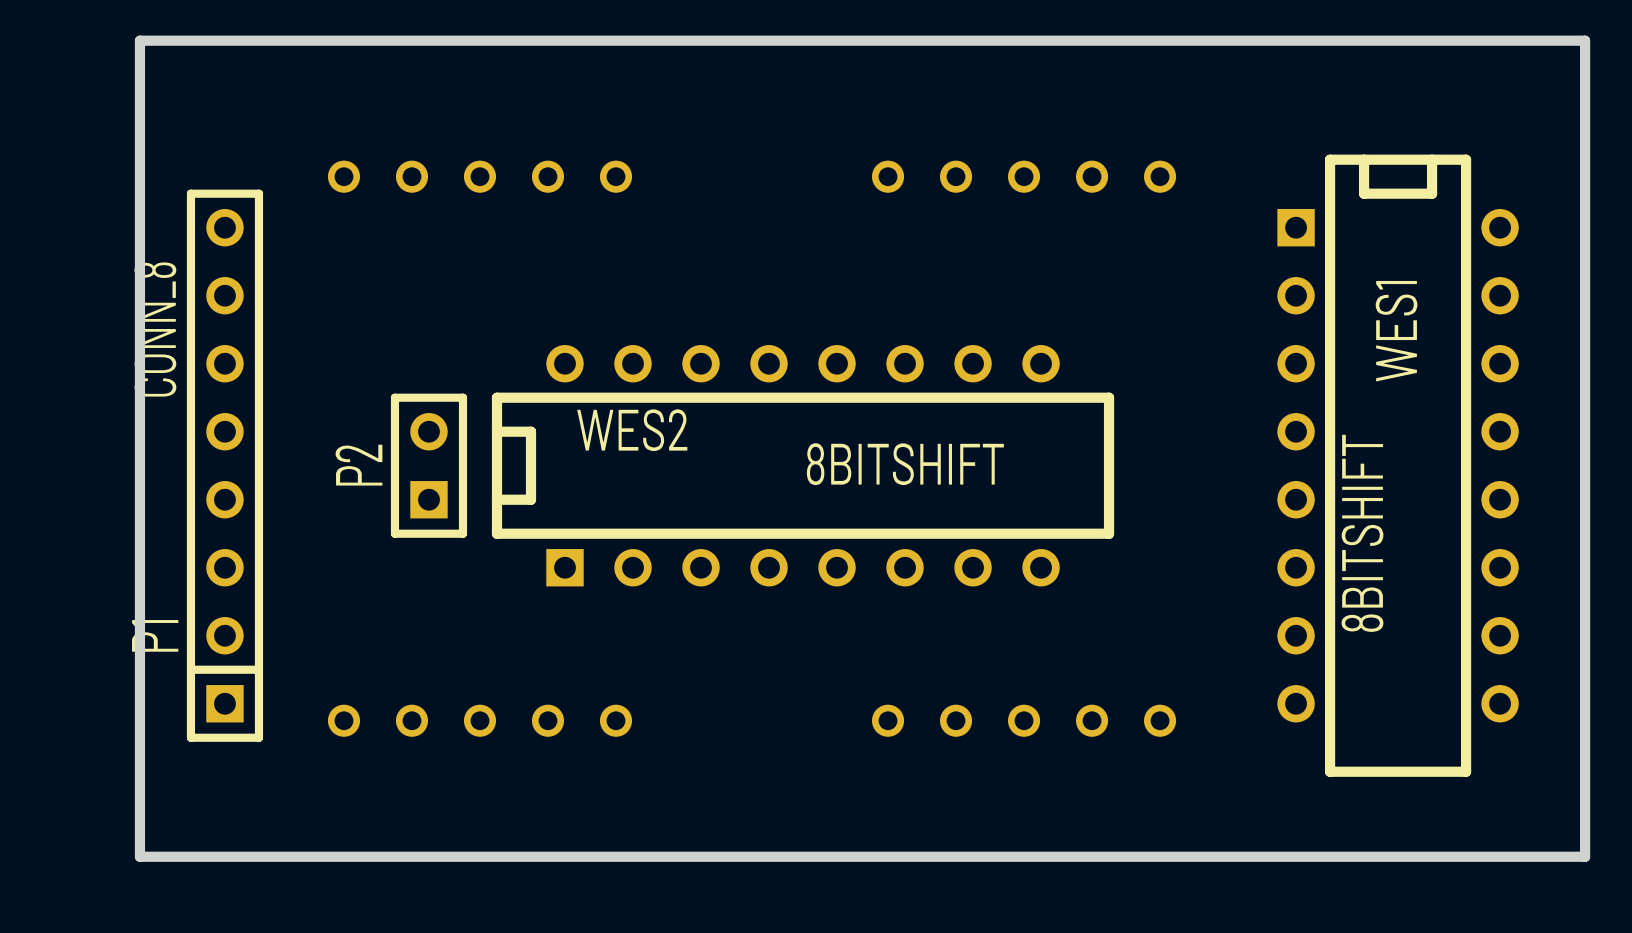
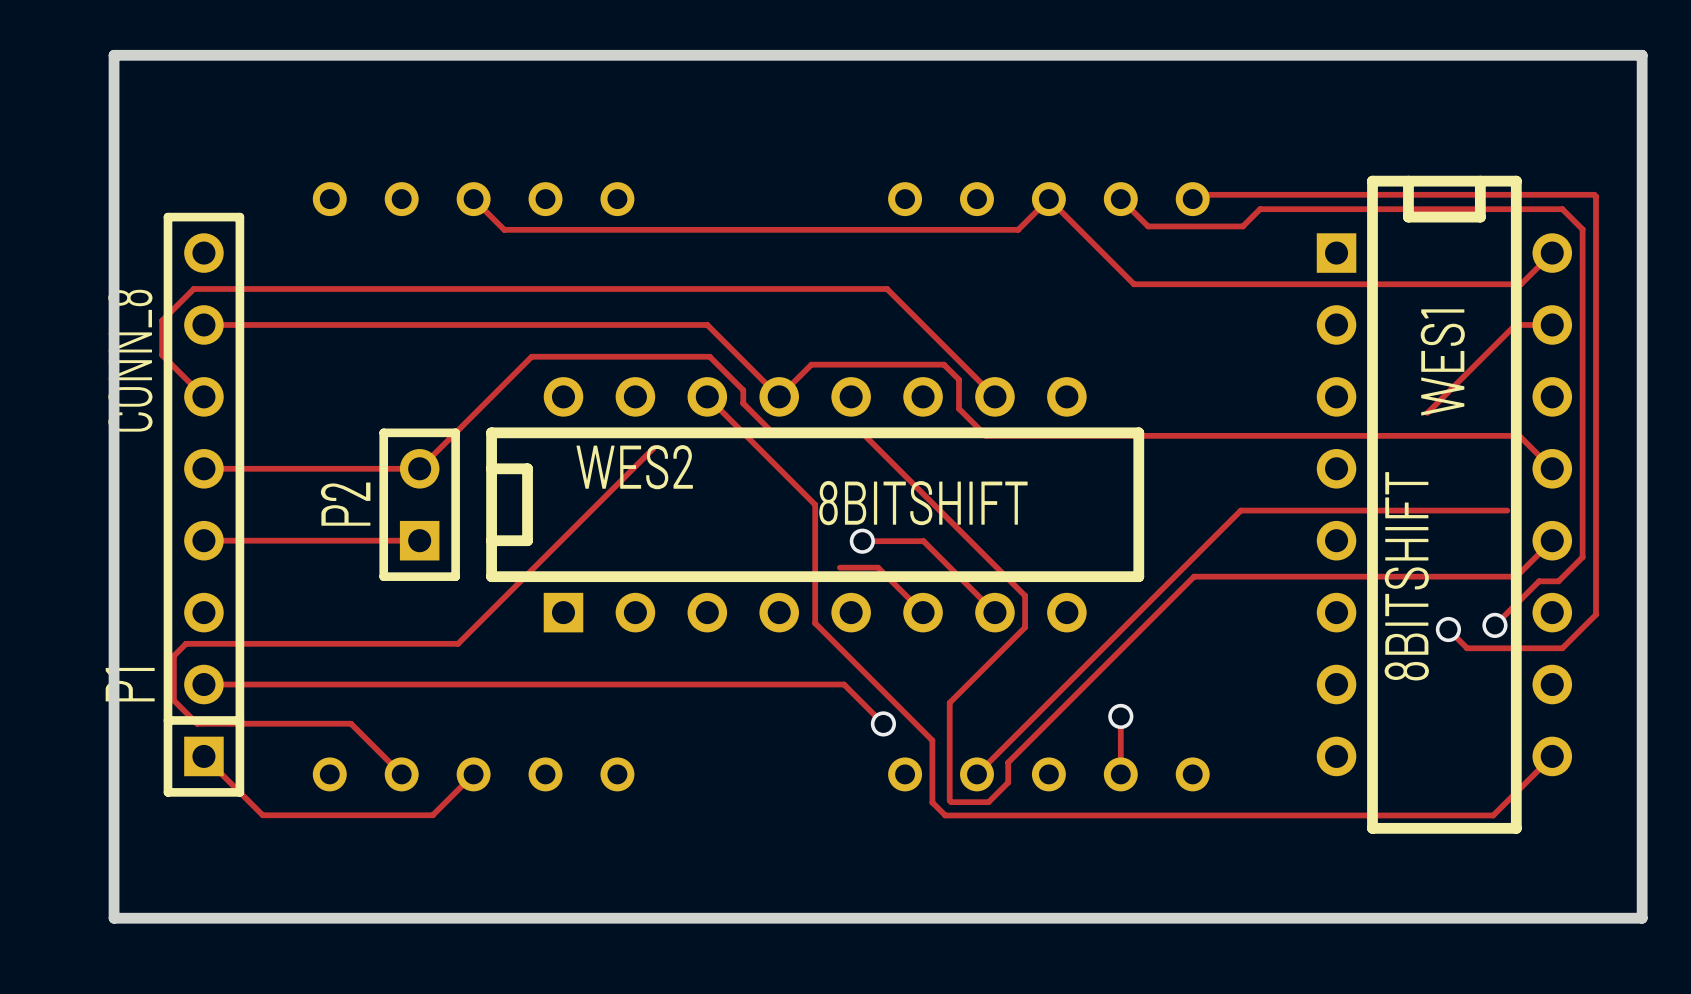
track: none -> (473, 199) (504, 229) (1018, 229) (1048, 199) (1134, 284) (1521, 284) (1552, 253)
track: none -> (1120, 199) (1148, 226) (1242, 226) (1260, 209) (1562, 209) (1582, 229) (1582, 557) (1558, 581) (1539, 581) (1494, 625)
track: none -> (1192, 199) (1197, 194) (1594, 194) (1595, 196) (1595, 614) (1562, 648) (1467, 648) (1448, 629)
track: none -> (203, 324) (707, 324) (779, 396) (811, 364) (943, 364) (959, 379) (959, 408) (986, 435) (1519, 435) (1552, 468)
track: none -> (1552, 324) (1515, 324) (1427, 412)
track: none -> (203, 396) (162, 355) (162, 320) (193, 289) (887, 289) (994, 396)
track: none -> (707, 396) (815, 504) (815, 623) (932, 740) (932, 802) (945, 815) (1493, 815) (1552, 756)
track: none -> (653, 448) (458, 643) (186, 643) (173, 655) (173, 700) (197, 723) (351, 723) (401, 774)
track: none -> (203, 468) (419, 468) (531, 356) (709, 356) (743, 390) (743, 403) (774, 434) (863, 434) (1025, 595) (1025, 627) (949, 702) (949, 800) (951, 802) (988, 802) (1008, 782) (1008, 762) (1194, 576) (1516, 576) (1552, 540)
track: none -> (1507, 510) (1240, 510) (976, 774)
track: none -> (203, 540) (419, 540)
track: none -> (862, 541) (923, 541) (994, 612)
via: none -> (862, 541)
track: none -> (839, 567) (878, 567) (923, 612)
via: none -> (1494, 625)
via: none -> (1448, 629)
track: none -> (203, 684) (844, 684) (883, 723)
track: none -> (1120, 716) (1120, 774)
via: none -> (1120, 716)
via: none -> (883, 723)
track: none -> (203, 756) (262, 815) (432, 815) (473, 774)

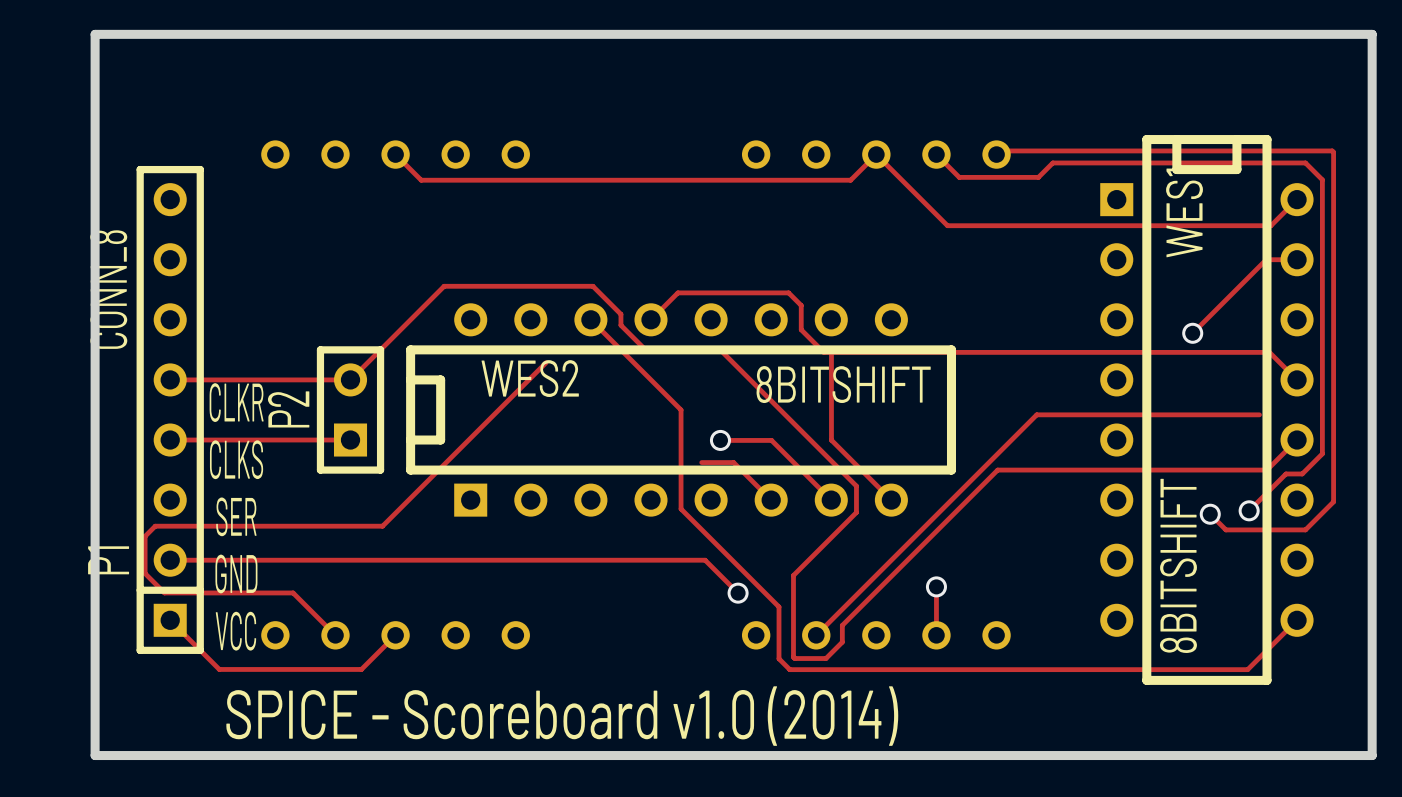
track: (203, 324) (707, 324) (779, 396) -> none
WES1 name position: WES1 (1442, 362) -> WES1 (1184, 212)
track: (203, 396) (162, 355) (162, 320) (193, 289) (887, 289) (994, 396) -> none
via: none -> (1192, 333)
track: none -> (831, 352) (831, 440) (891, 500)
text: none -> CLKR (236, 402)
WES2 value position: 8BITSHIFT (923, 503) -> 8BITSHIFT (843, 384)
text: none -> CLKS (236, 459)
WES1 value position: 8BITSHIFT (1406, 576) -> 8BITSHIFT (1178, 565)
text: none -> SER (236, 516)
text: none -> GND (236, 574)
text: none -> VCC (235, 631)
text: none -> SPICE - Scoreboard v1.0 (2014) (562, 716)

